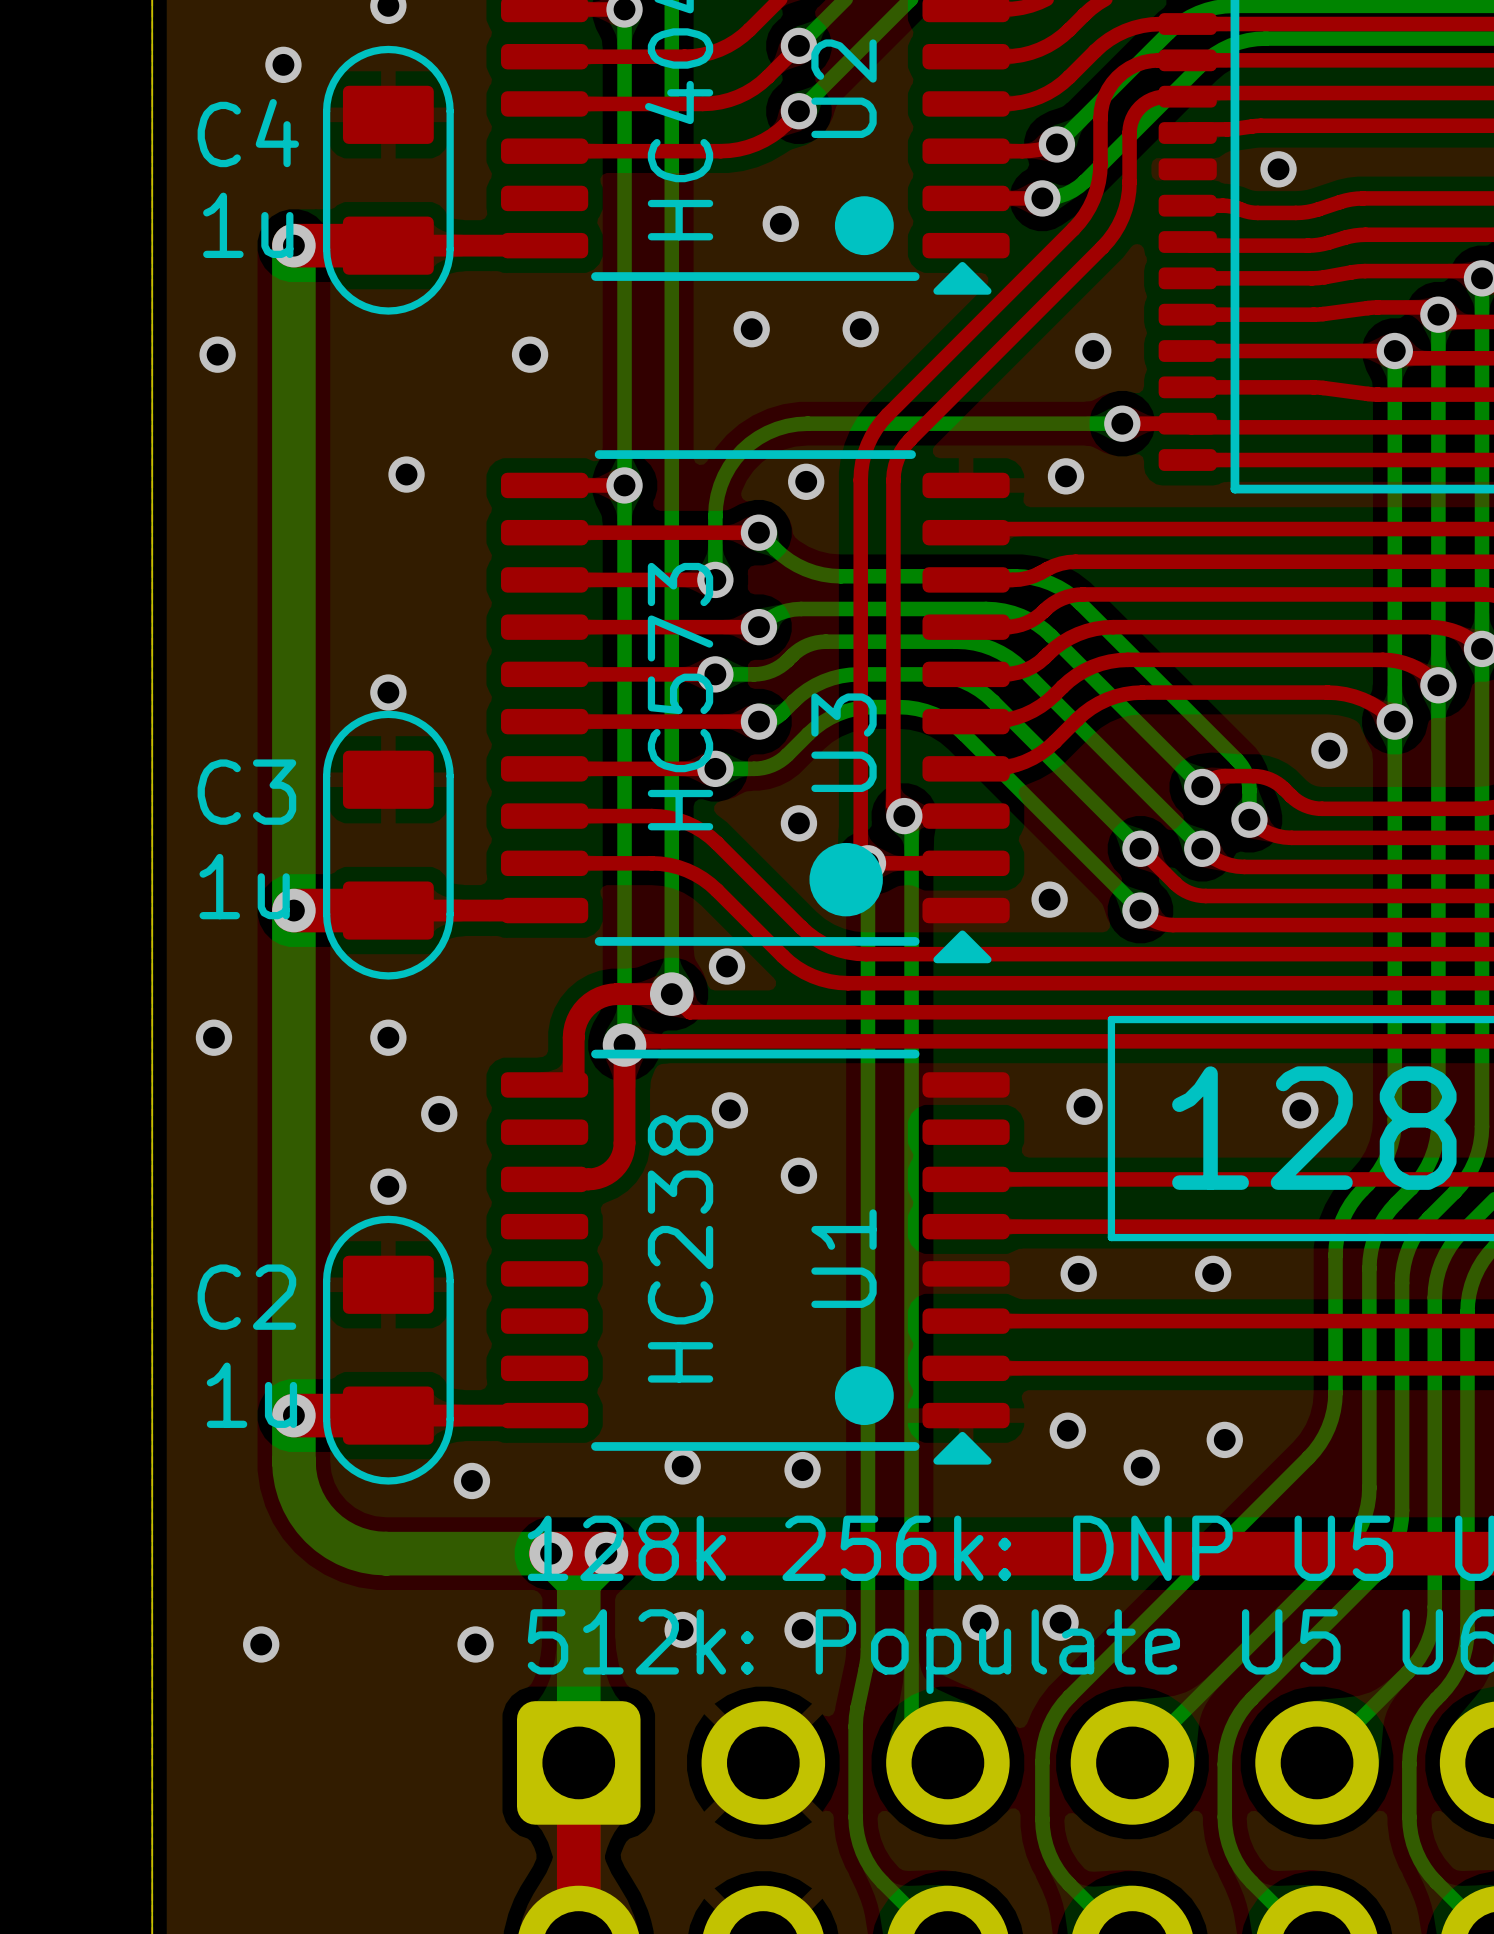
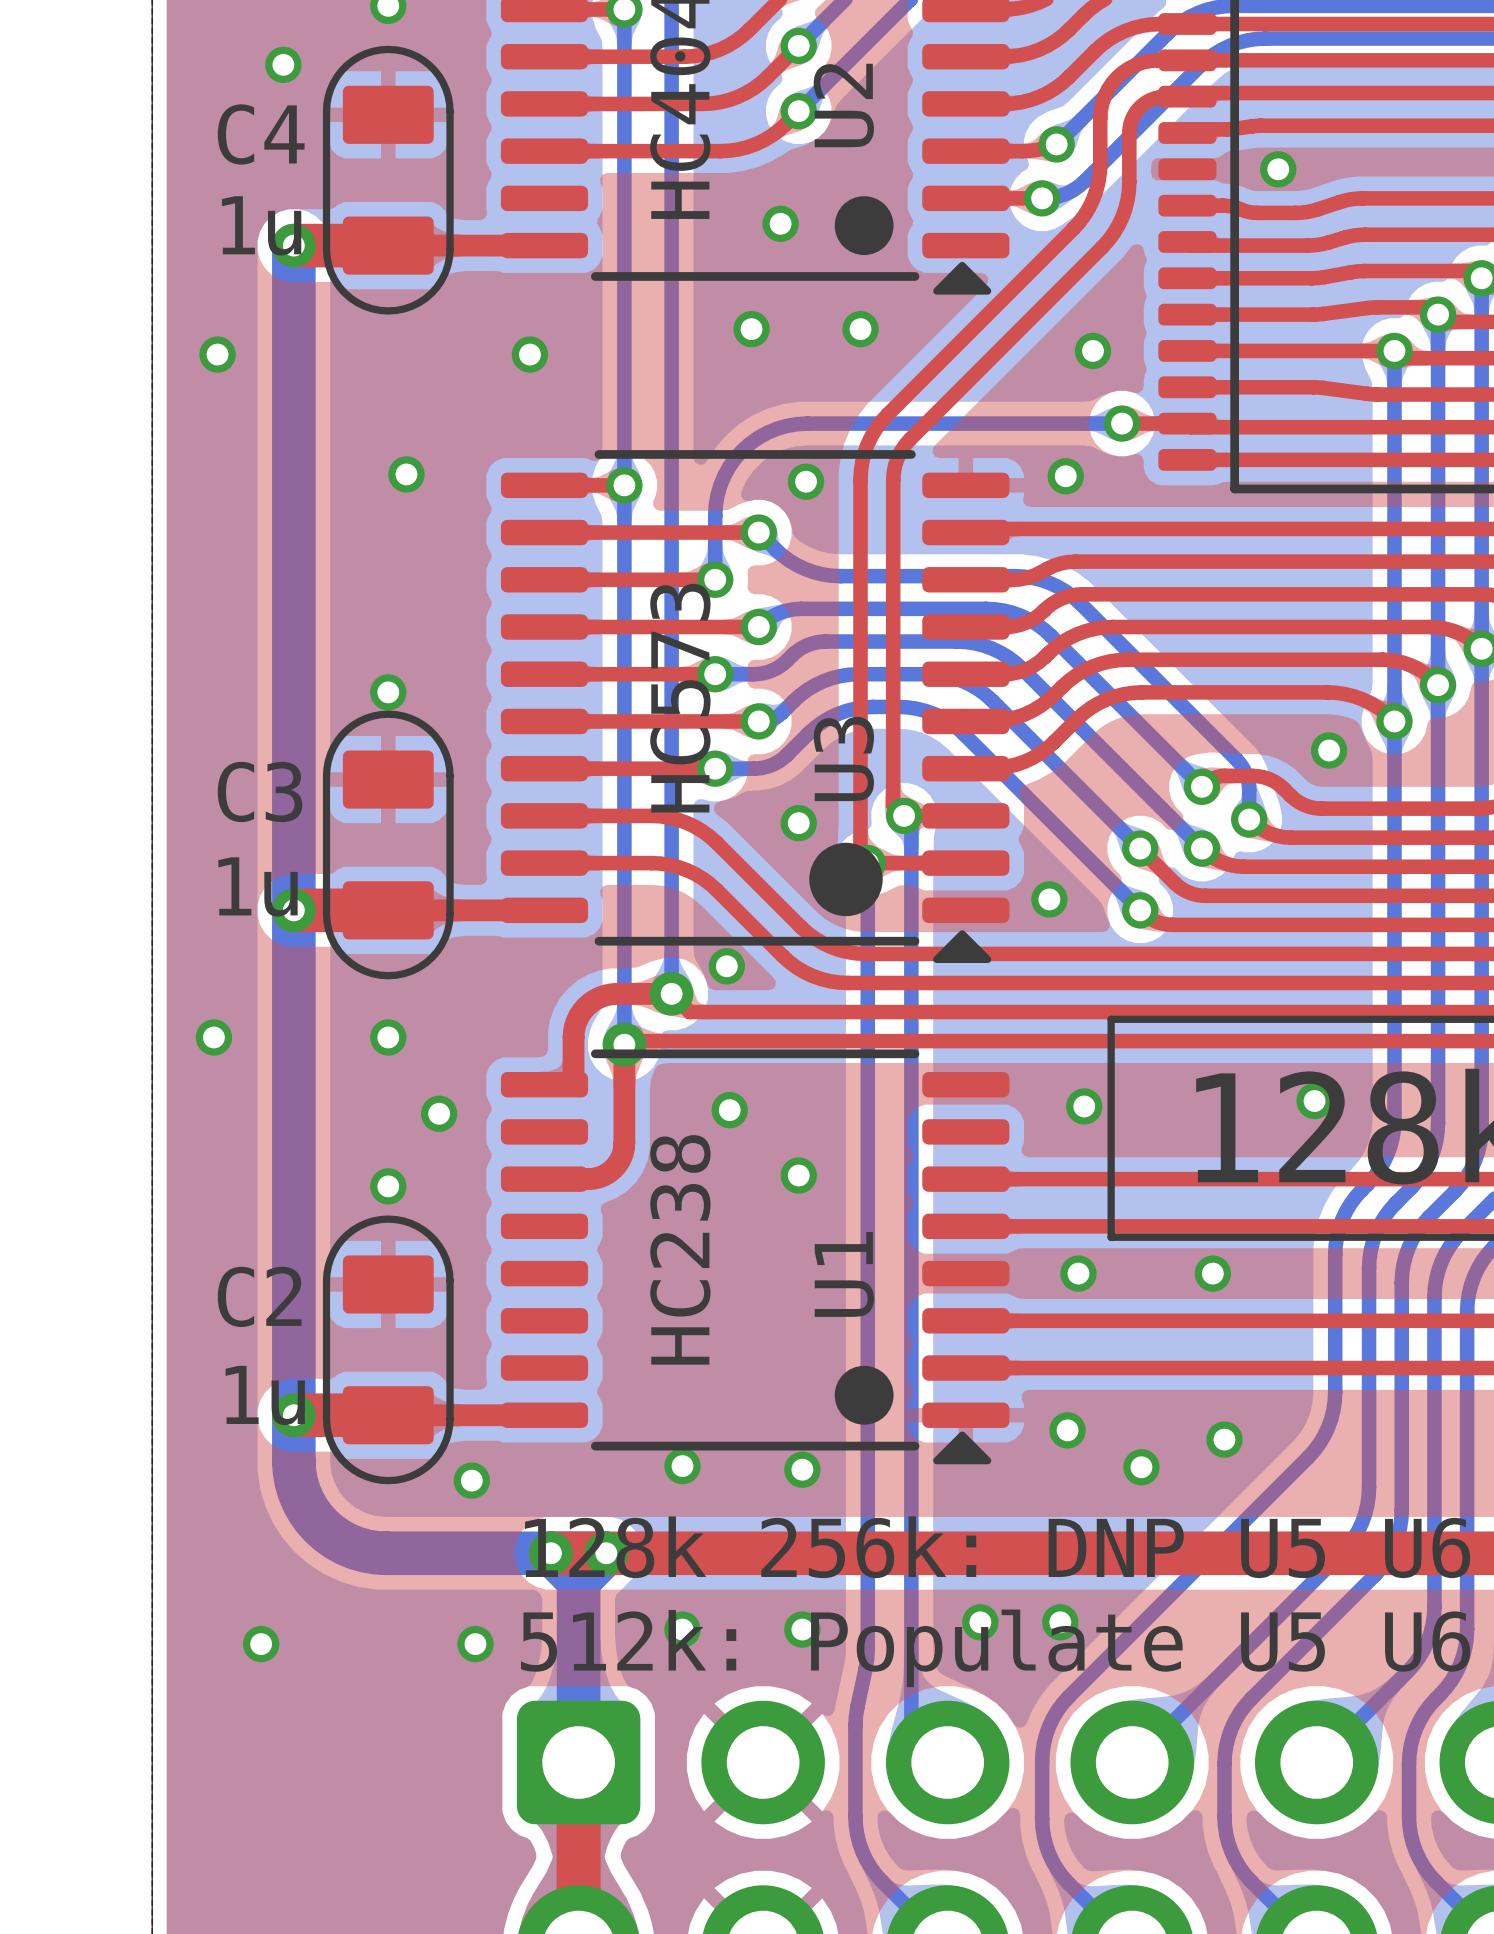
via position: (1300, 1110) -> (1314, 1101)

